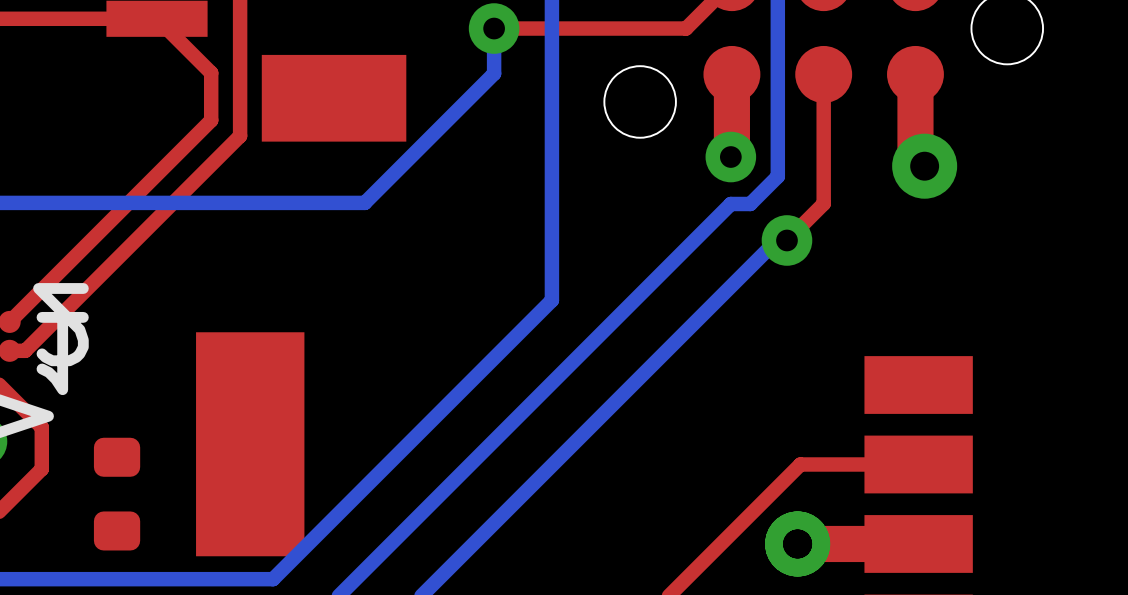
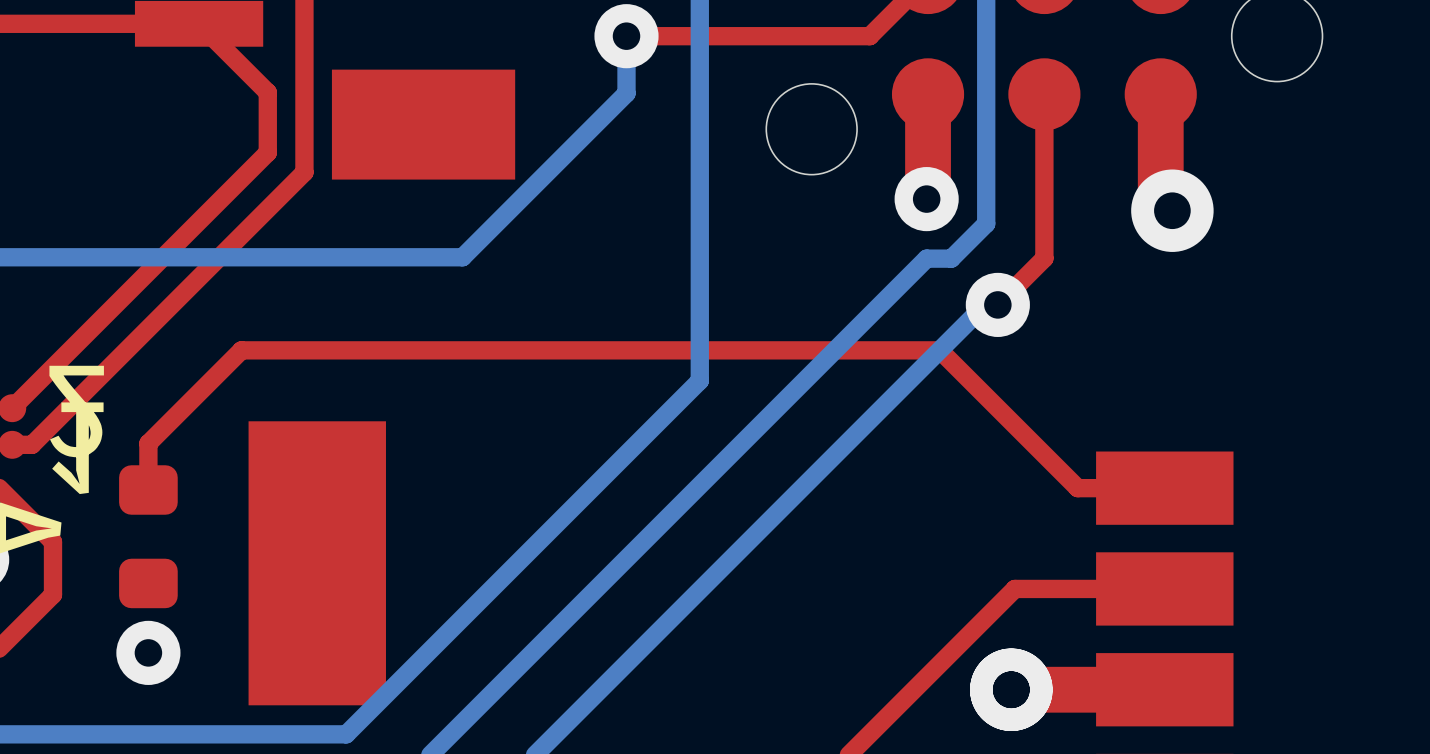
top track: none -> (1164, 488) (1077, 488) (939, 350) (241, 350) (148, 443) (148, 489)
part position: (117, 494) -> (148, 536)
via: none -> (148, 652)

